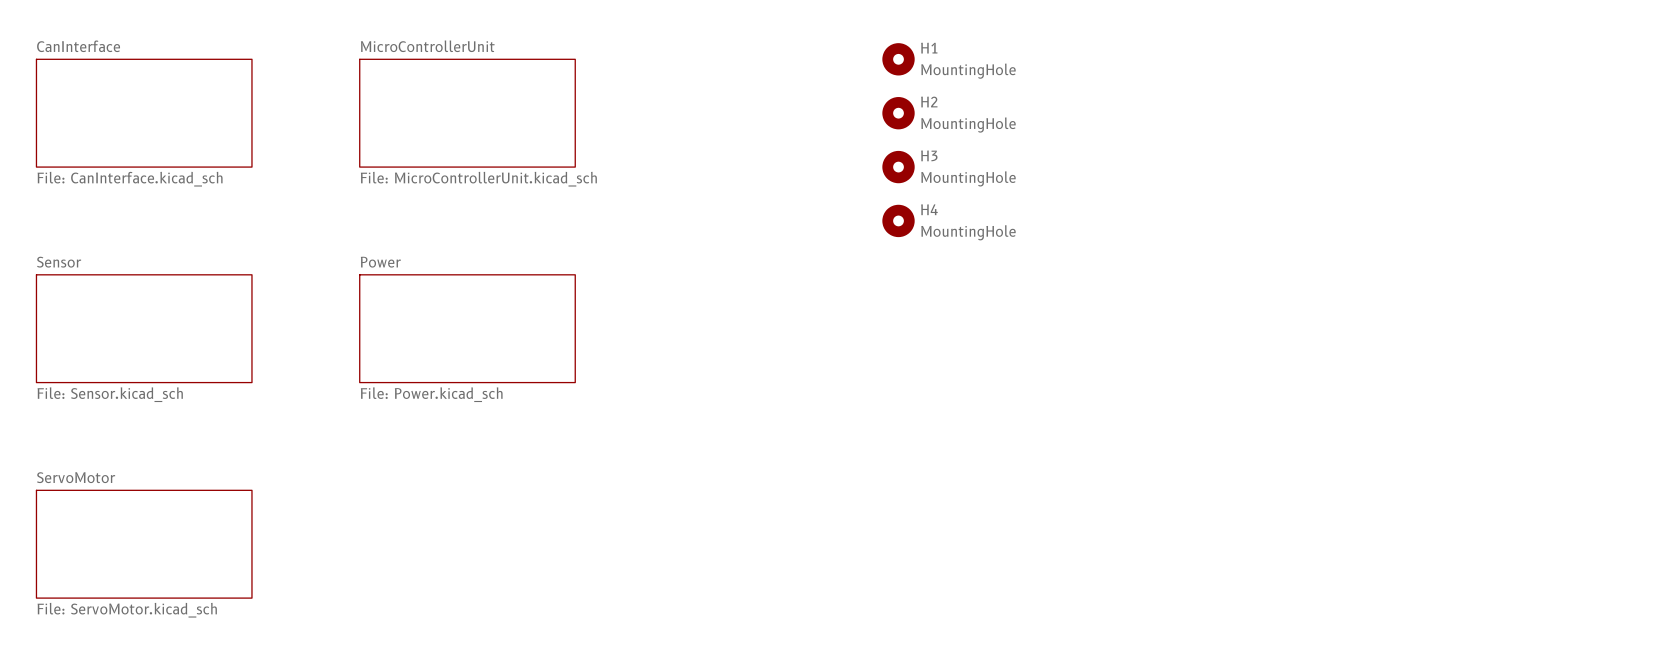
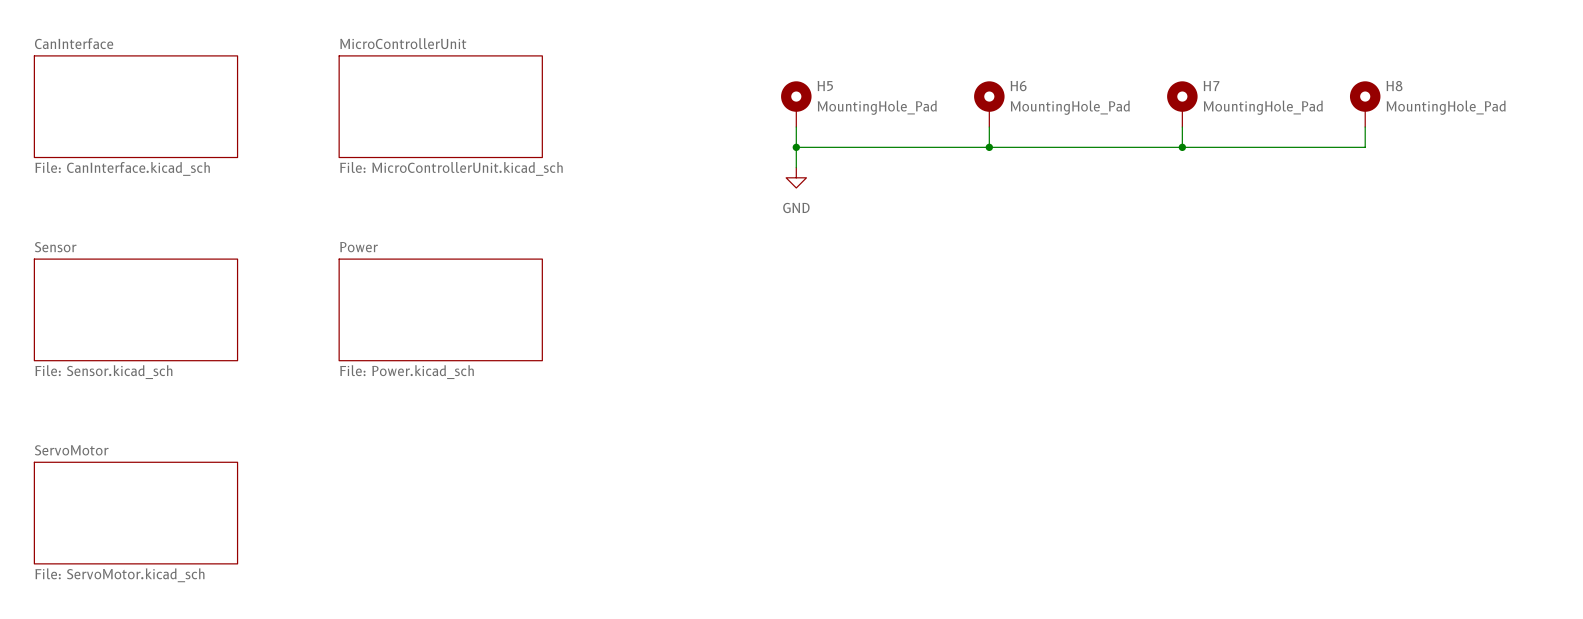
H1: MountingHole (898, 59) -> none
H5: none -> MountingHole_Pad (796, 104)
H6: none -> MountingHole_Pad (989, 104)
H7: none -> MountingHole_Pad (1182, 104)
H8: none -> MountingHole_Pad (1365, 104)
H2: MountingHole (898, 113) -> none
wire: none -> (796, 127) (796, 167)
wire: none -> (989, 127) (989, 147)
wire: none -> (1182, 127) (1182, 147)
wire: none -> (1365, 127) (1365, 147) (796, 147)
junction: none -> (796, 147)
junction: none -> (989, 147)
junction: none -> (1182, 147)
H3: MountingHole (898, 167) -> none
power symbol: none -> GND (796, 177)
H4: MountingHole (898, 220) -> none

